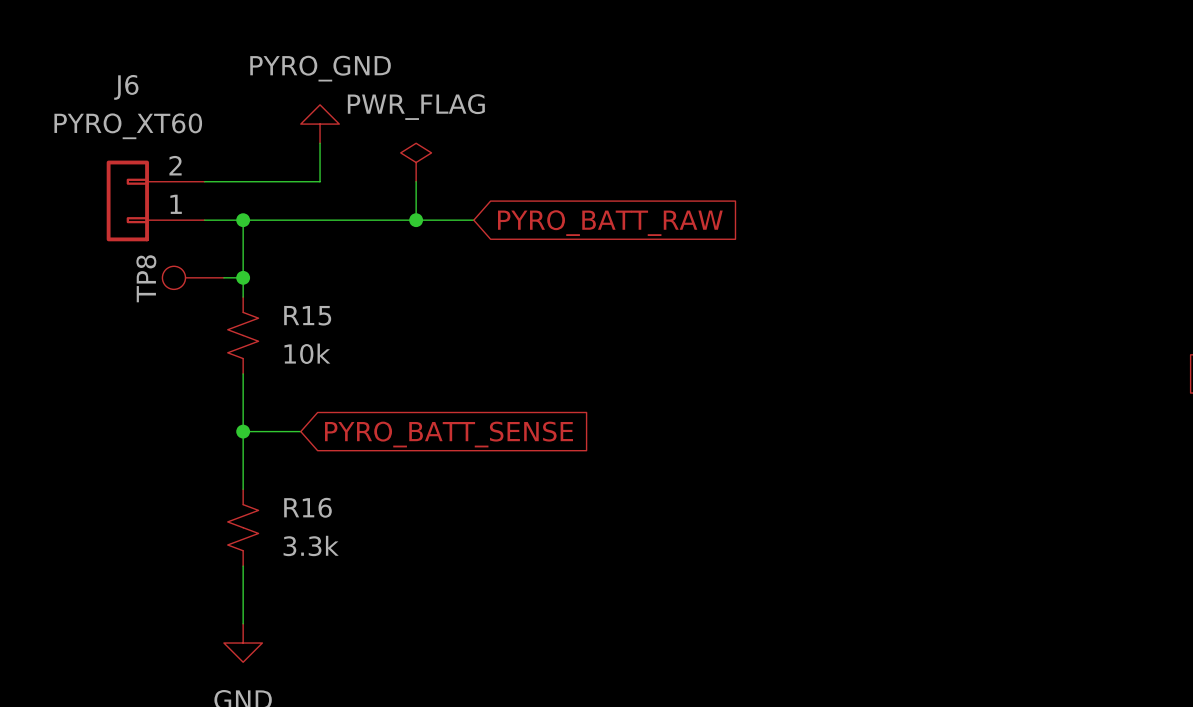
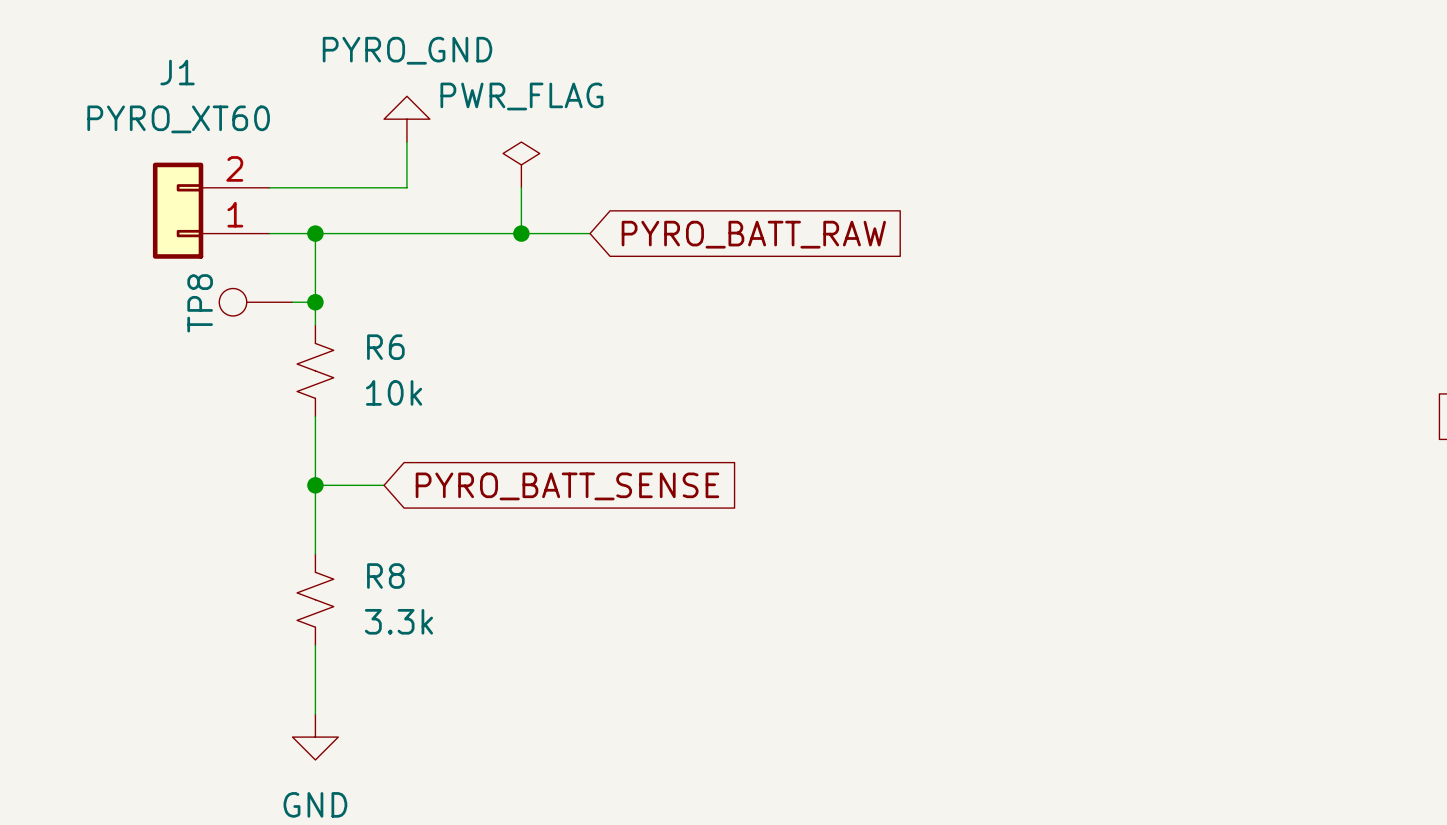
J6 name: J6 (126, 87) -> J1 (177, 72)
R15 name: R15 (307, 315) -> R6 (385, 347)
R16 name: R16 (307, 507) -> R8 (385, 576)

